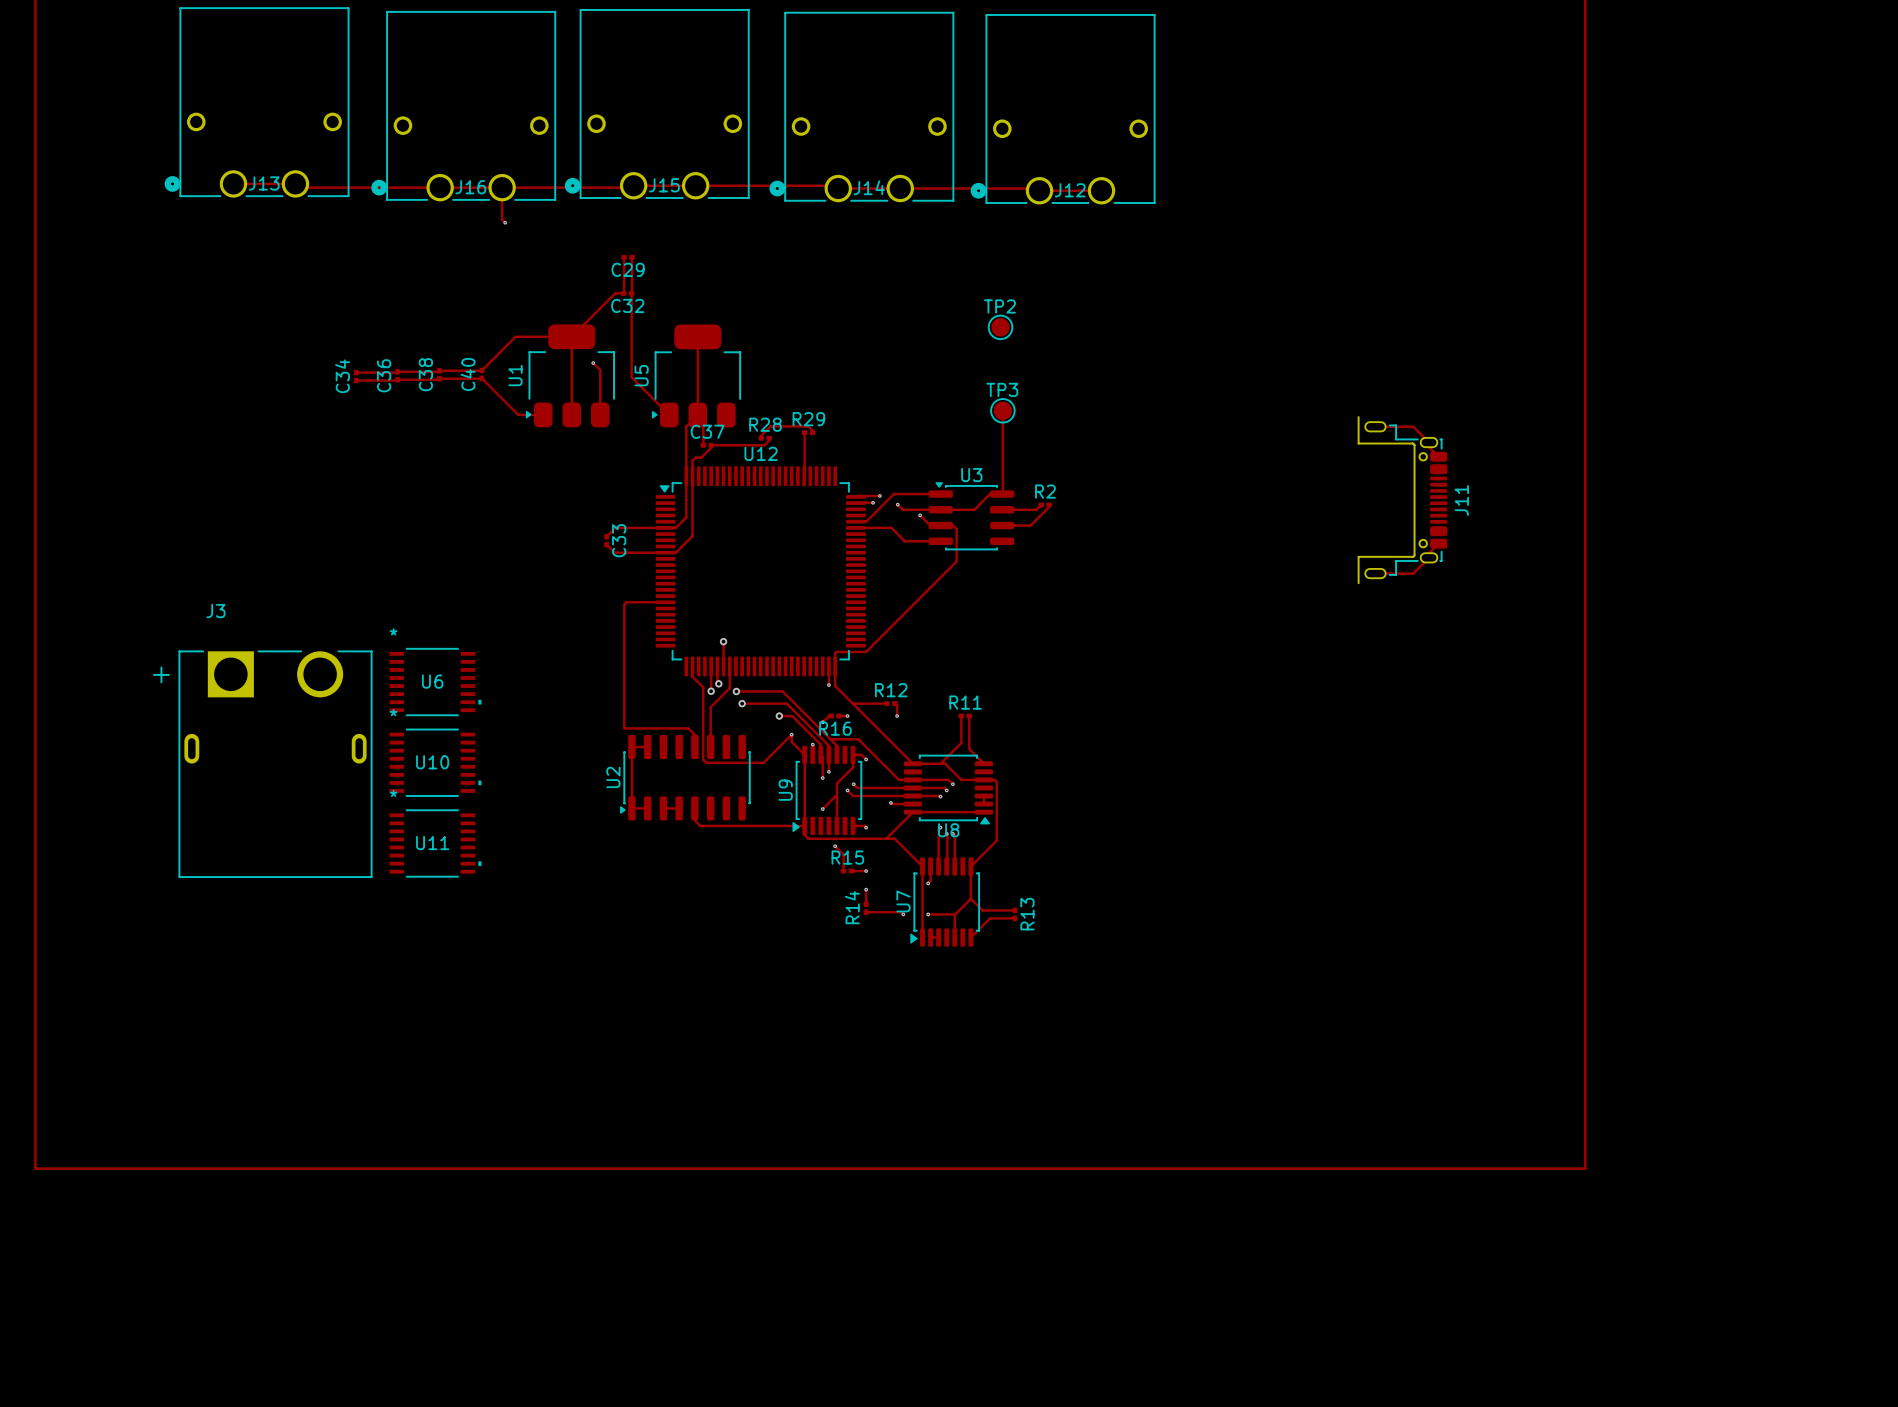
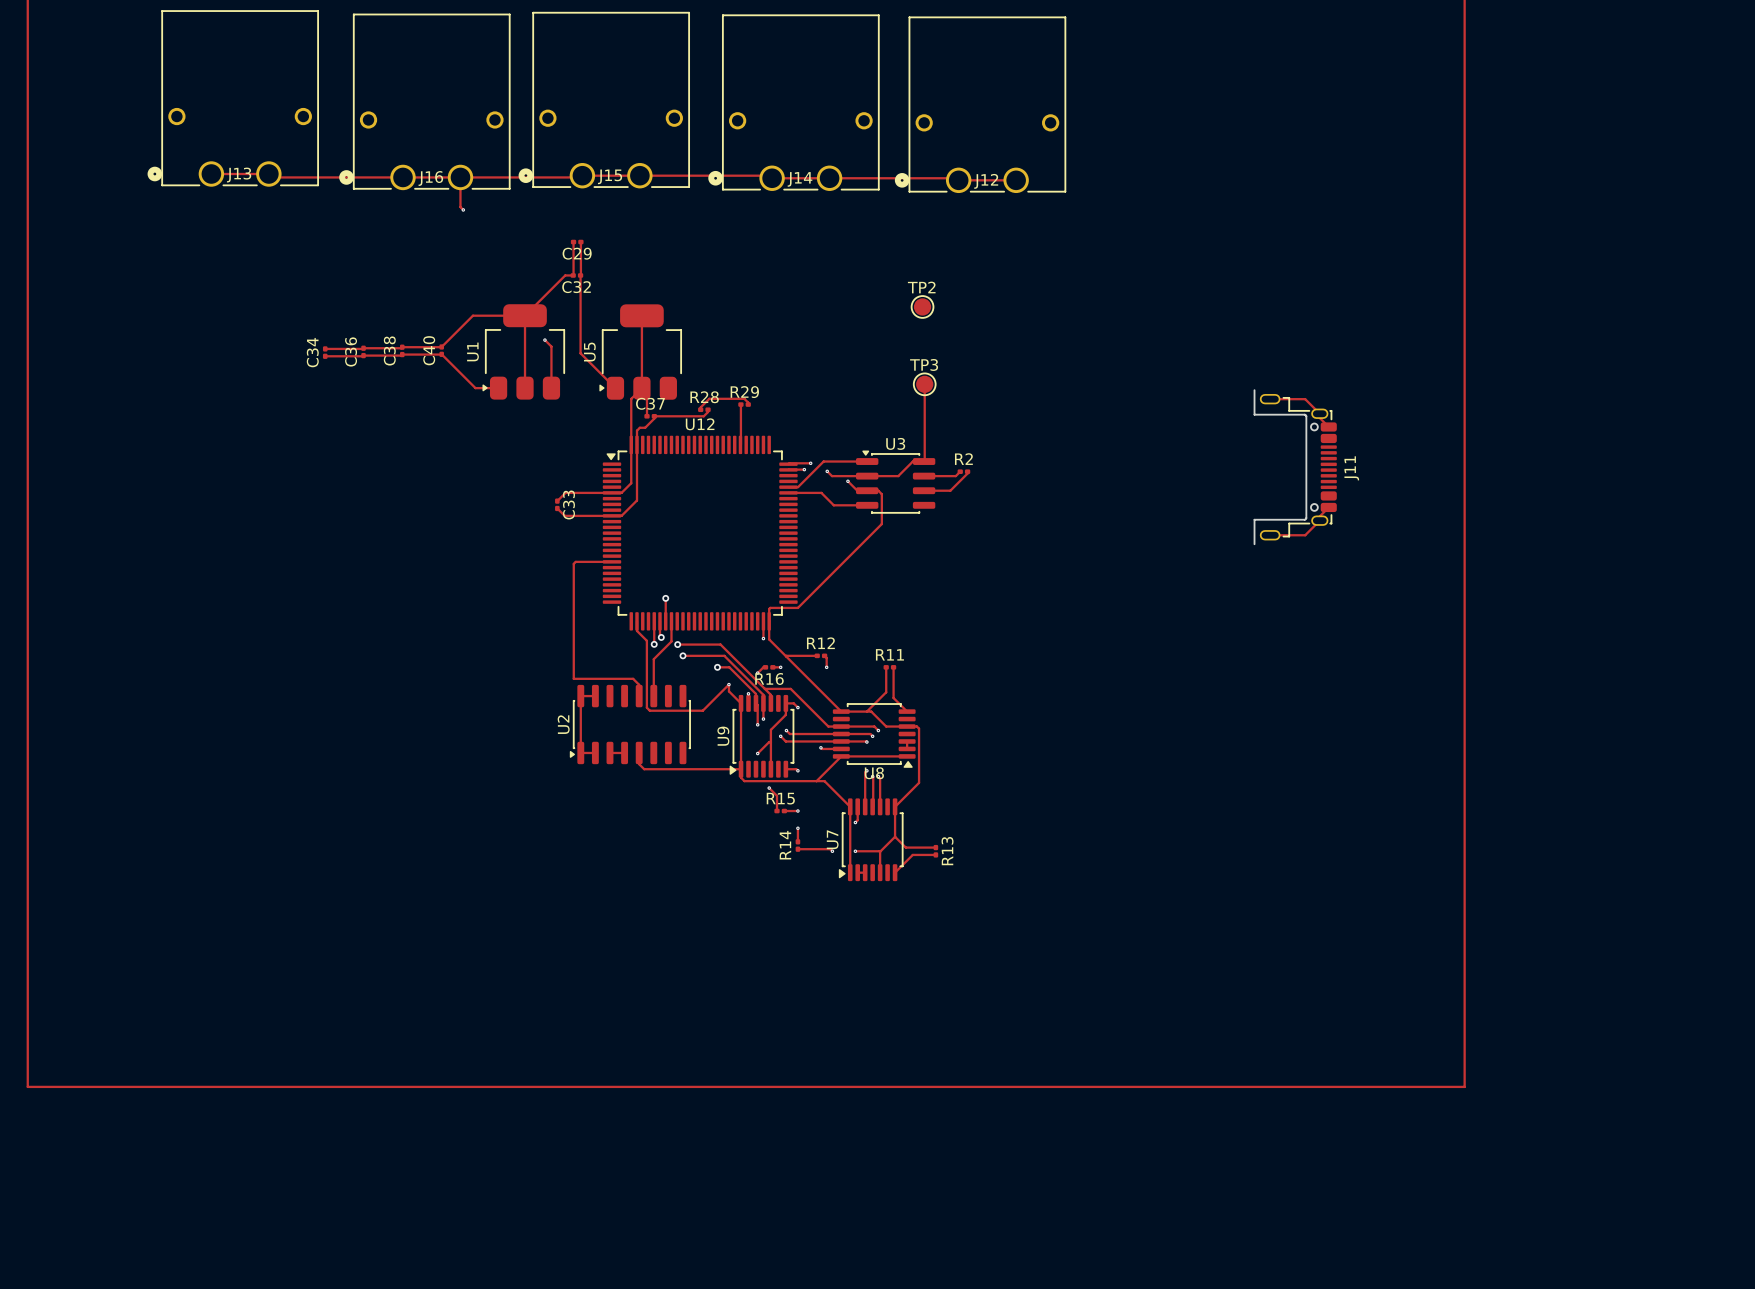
U6: (435, 682) -> none
U10: (435, 762) -> none
J3: (262, 764) -> none
U11: (435, 843) -> none

